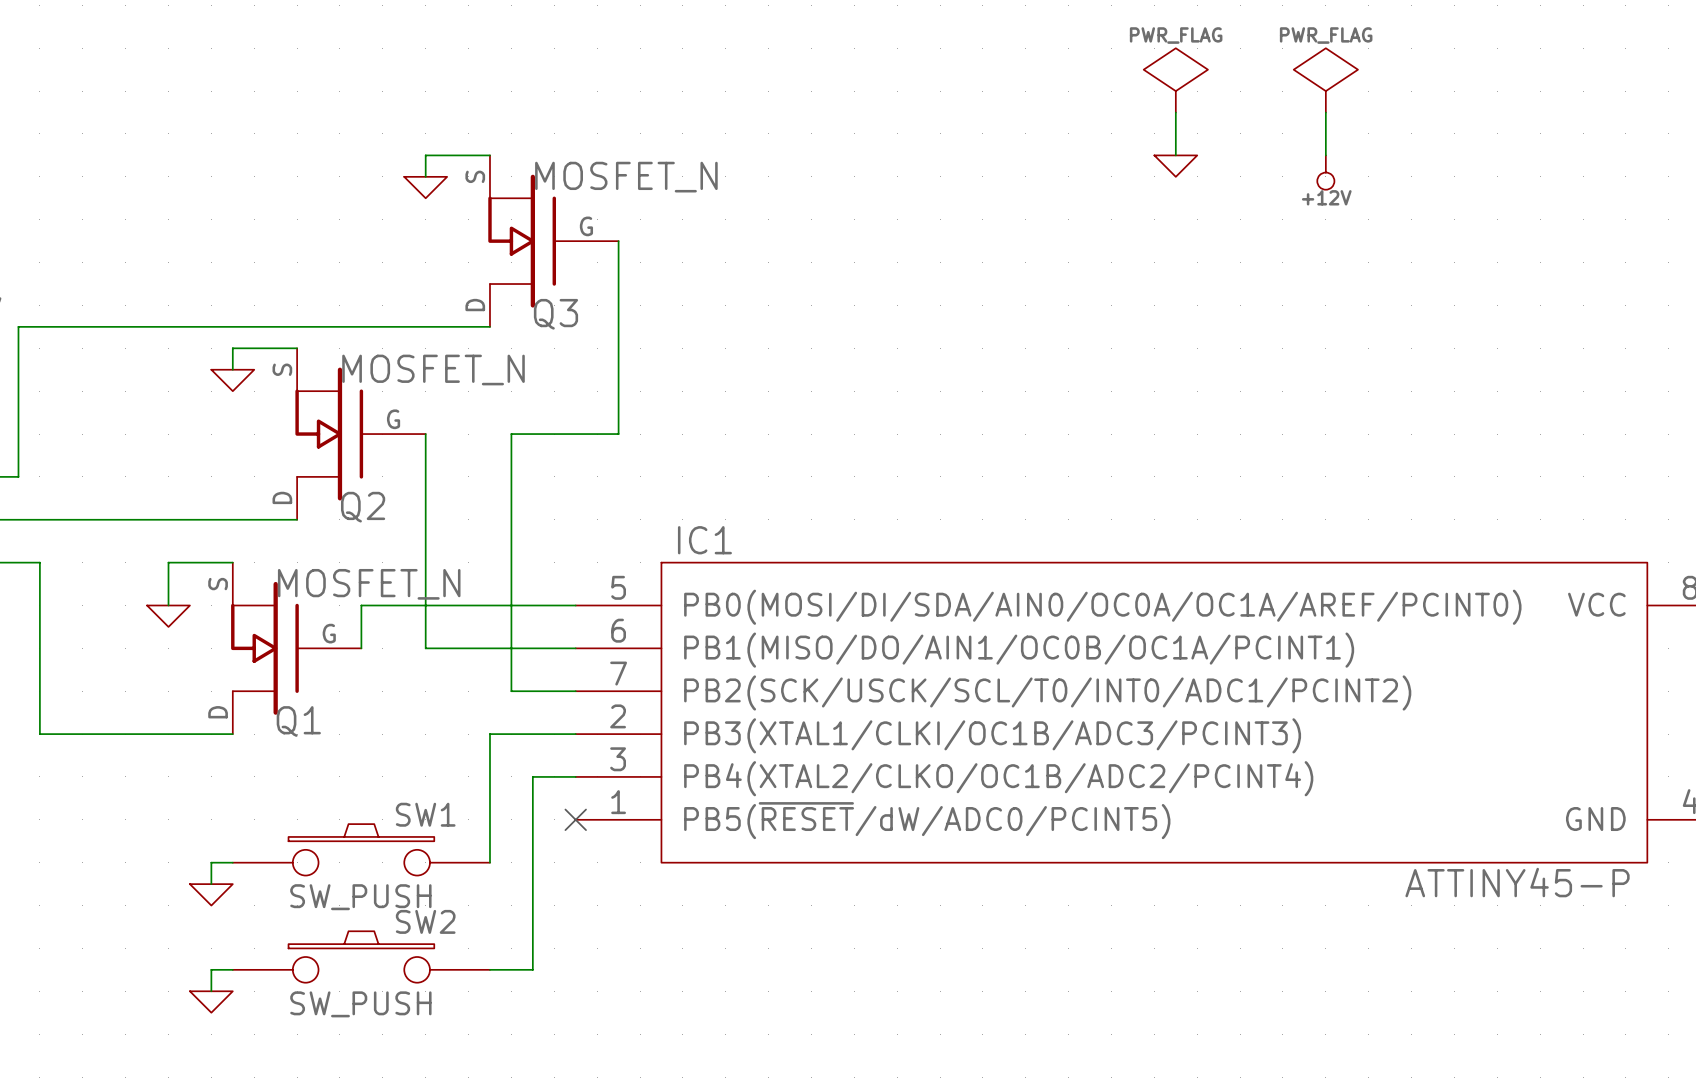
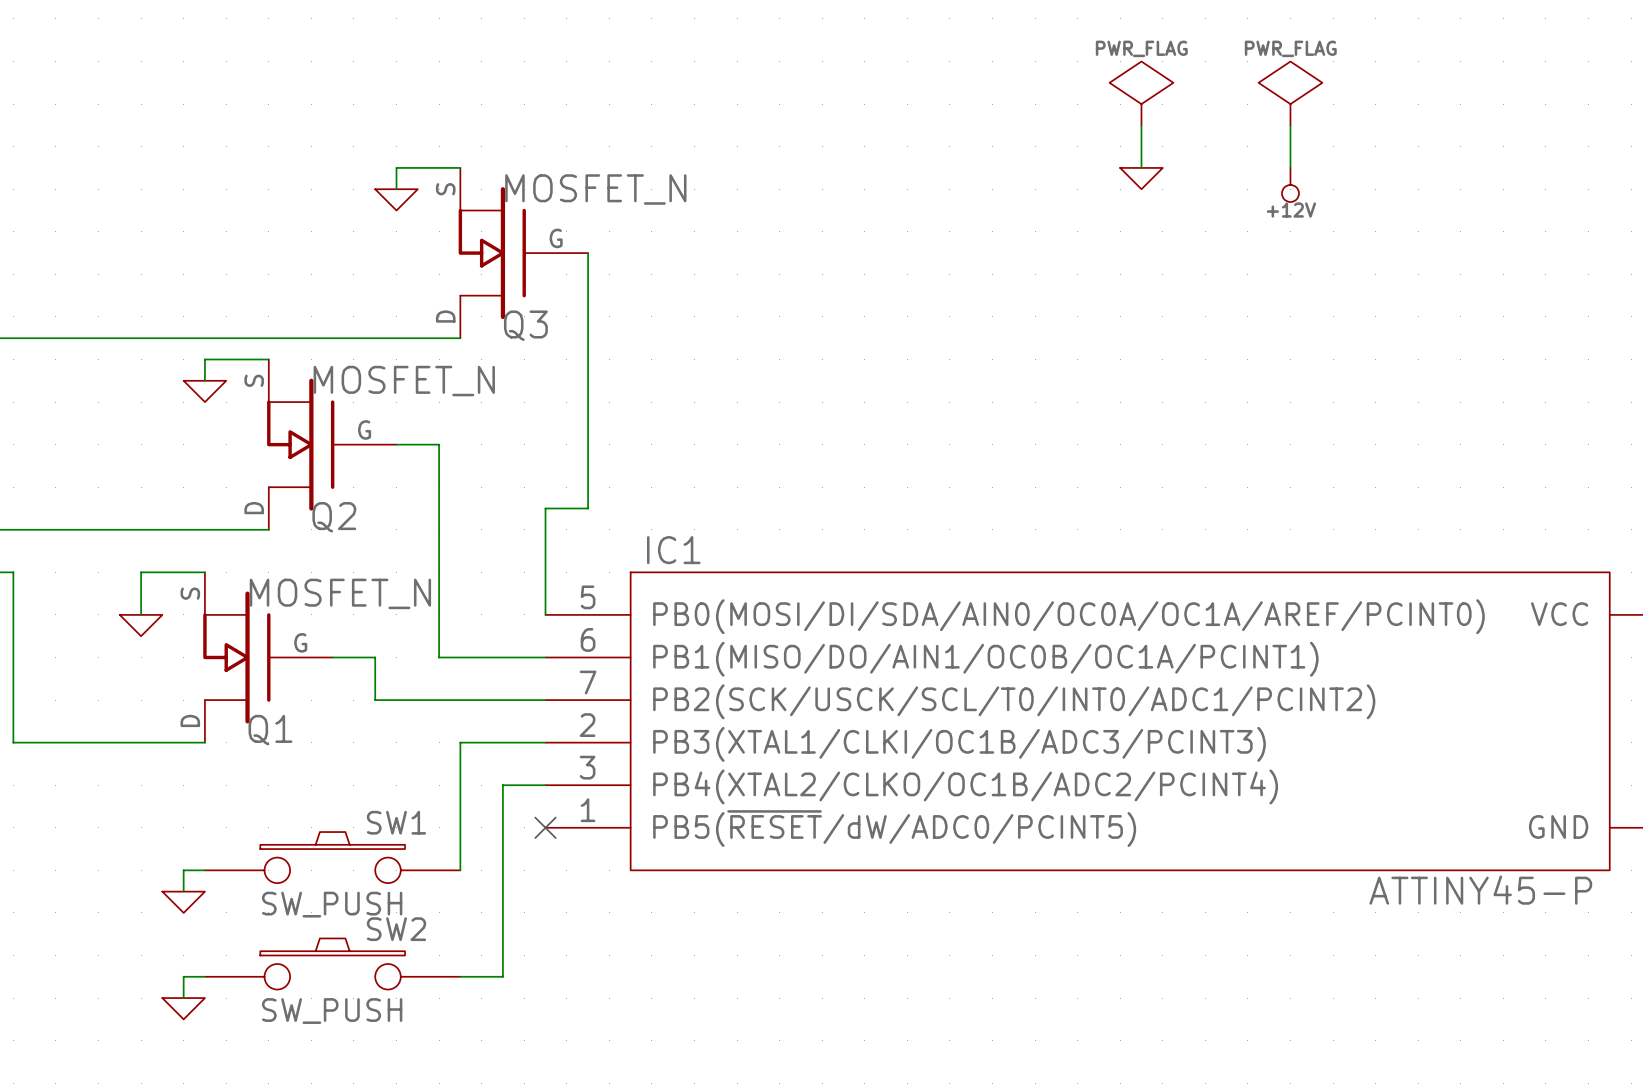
wire: (425, 434) (425, 648) (468, 648) -> (396, 444) (439, 444) (439, 657)
wire: (618, 434) (511, 434) (511, 691) -> (588, 444) (588, 508) (545, 508) (545, 614)
wire: (575, 605) (361, 605) (361, 648) -> (481, 700) (375, 700) (375, 657) (332, 657)

